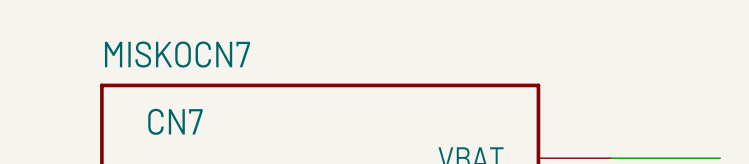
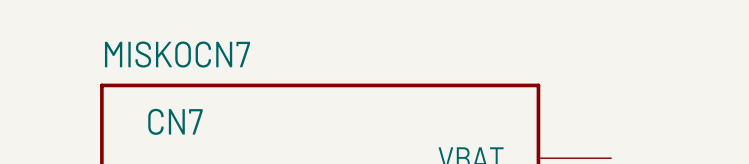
wire: (611, 158) (720, 158) -> none

